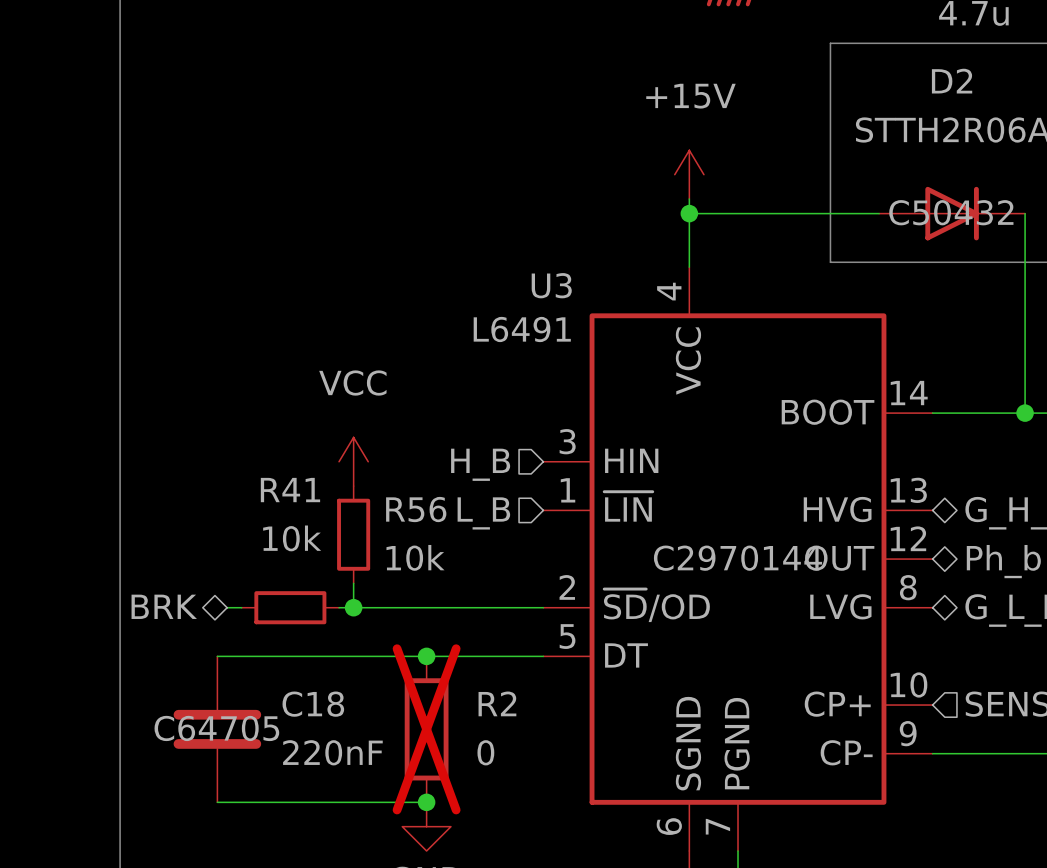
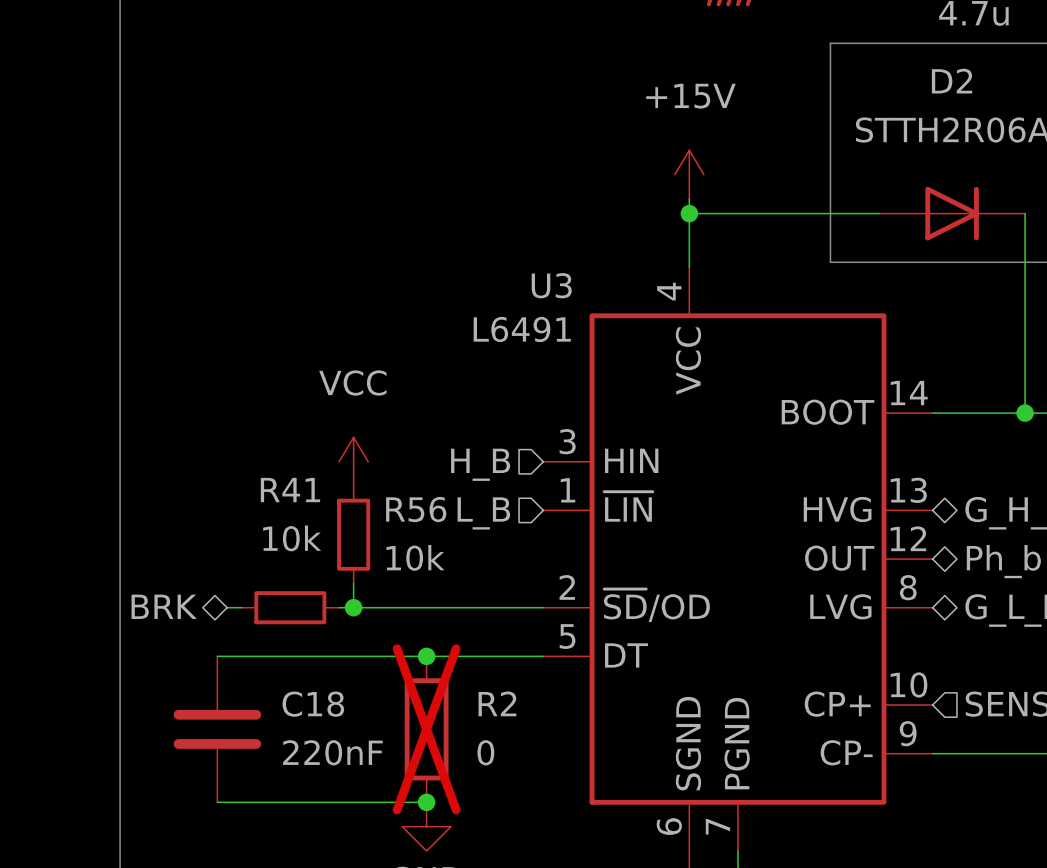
D2 text: C50432 (951, 212) -> none
U3 text: C2970144 (738, 558) -> none
C18 text: C64705 (216, 728) -> none

